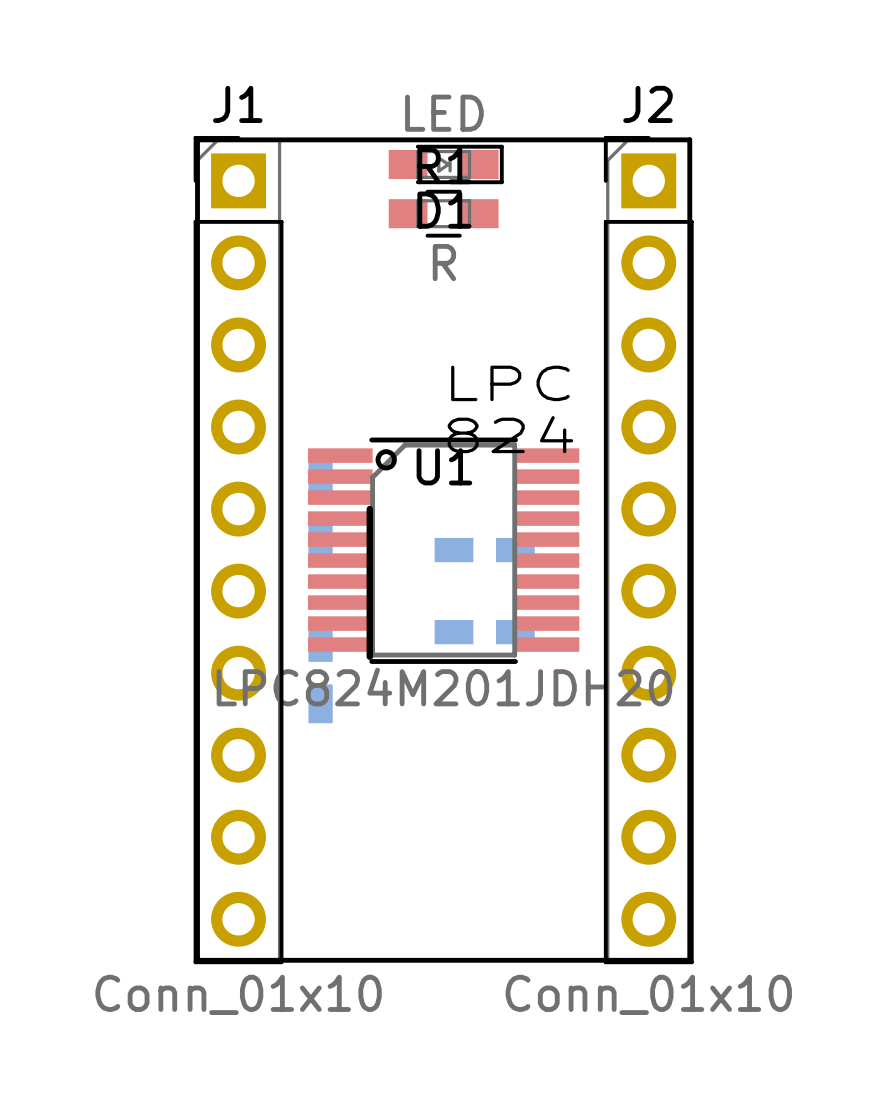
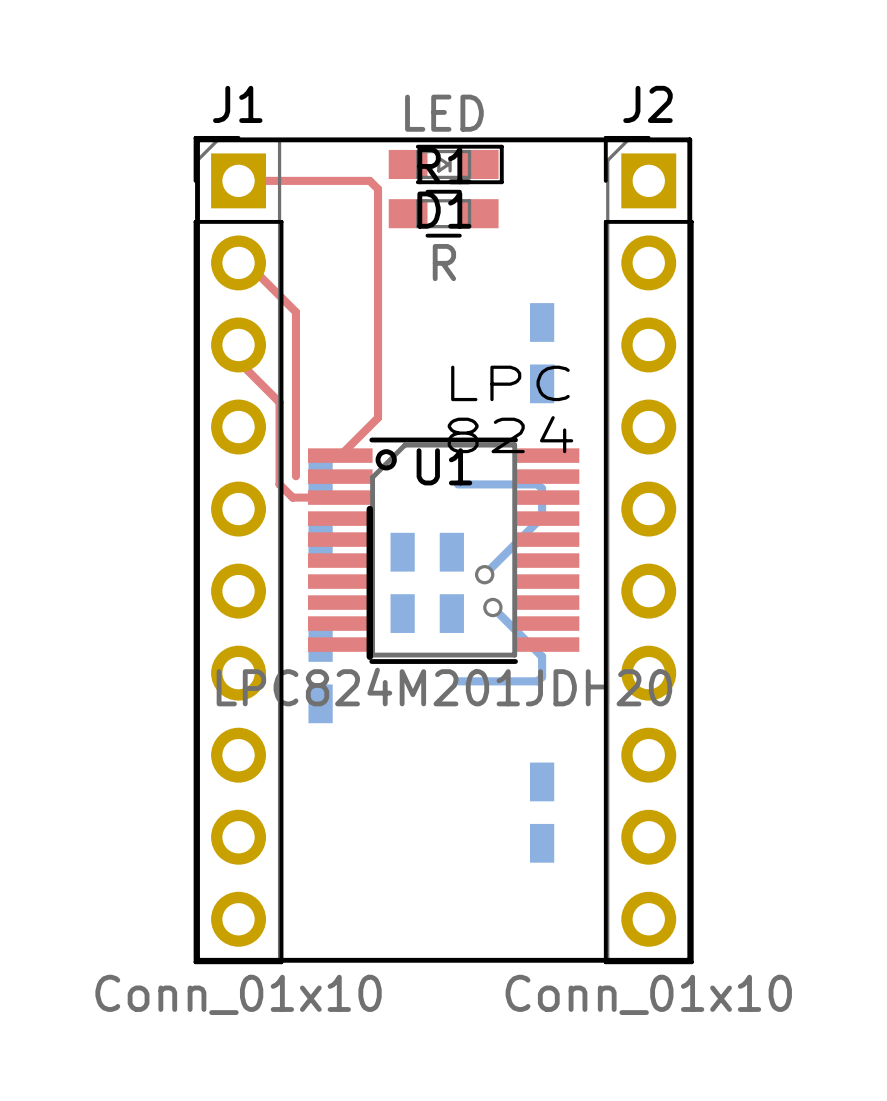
top track: none -> (238, 180) (369, 180) (378, 189) (378, 417) (340, 455)
top track: none -> (238, 262) (246, 262) (295, 312) (295, 476)
top track: none -> (238, 344) (238, 361) (279, 402) (279, 484) (292, 497) (340, 497)
part: none -> (542, 353)
bottom track: none -> (457, 484) (537, 484) (542, 488) (542, 517) (484, 574)
part: (484, 550) -> none
via: none -> (484, 574)
part: none -> (402, 582)
part: none -> (451, 582)
bottom track: none -> (492, 607) (542, 656) (542, 676) (537, 681) (457, 681)
via: none -> (492, 607)
part: (484, 632) -> none
part: none -> (542, 812)

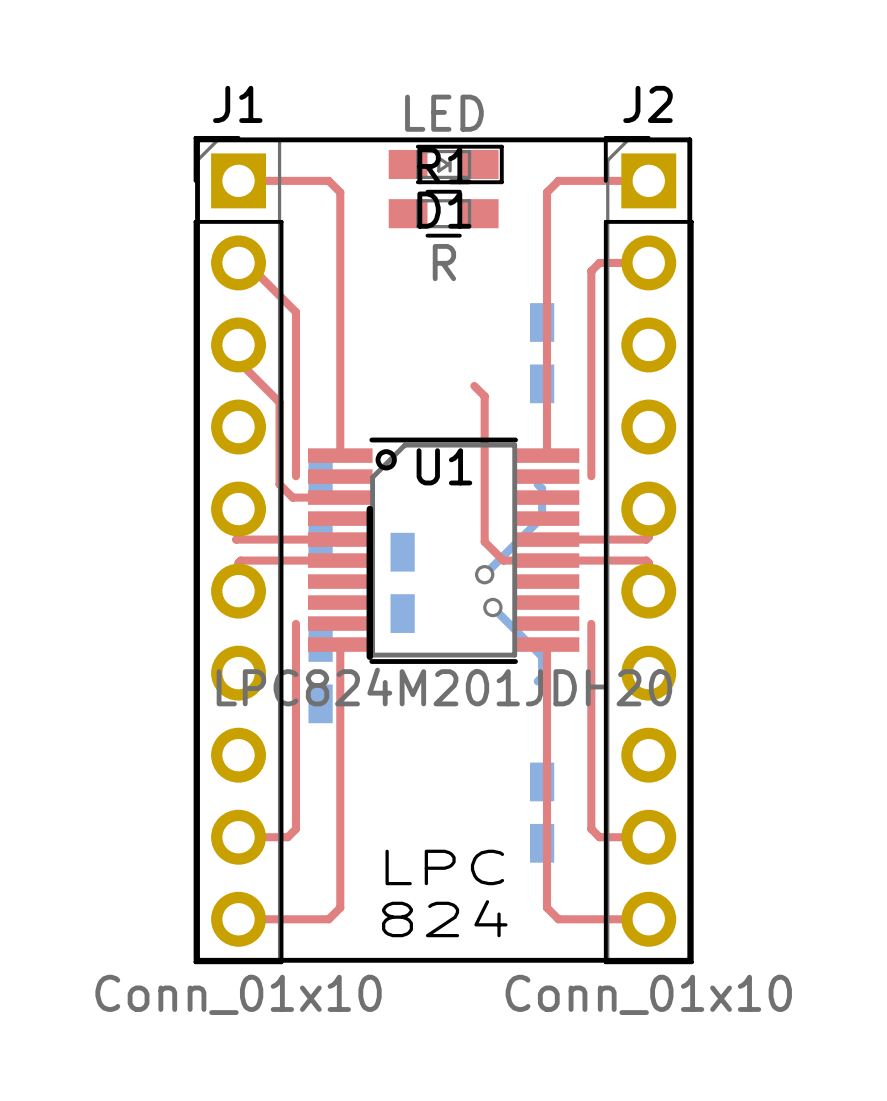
top track: (328, 180) (369, 180) (378, 189) (378, 417) (340, 455) -> (328, 180) (340, 192) (340, 455)
top track: none -> (648, 180) (558, 180) (547, 192) (547, 455)
top track: none -> (648, 262) (599, 262) (591, 271) (591, 476)
text position: LPC (510, 383) -> LPC (444, 867)
top track: none -> (474, 385) (484, 396) (484, 541) (503, 560) (646, 560) (648, 562) (648, 591)
text position: 824 (510, 434) -> 824 (444, 918)
bottom track: (457, 484) (537, 484) -> none
top track: none -> (238, 509) (238, 537) (236, 539) (340, 539)
top track: none -> (648, 509) (648, 537) (646, 539) (547, 539)
top track: none -> (340, 560) (240, 560) (238, 562) (238, 591)
part: (451, 582) -> none
top track: none -> (295, 623) (295, 829) (287, 837) (238, 837)
top track: none -> (591, 623) (591, 829) (599, 837) (648, 837)
top track: none -> (340, 644) (340, 907) (328, 919) (238, 919)
top track: none -> (547, 644) (547, 907) (558, 919) (648, 919)
bottom track: (457, 681) (537, 681) -> none

